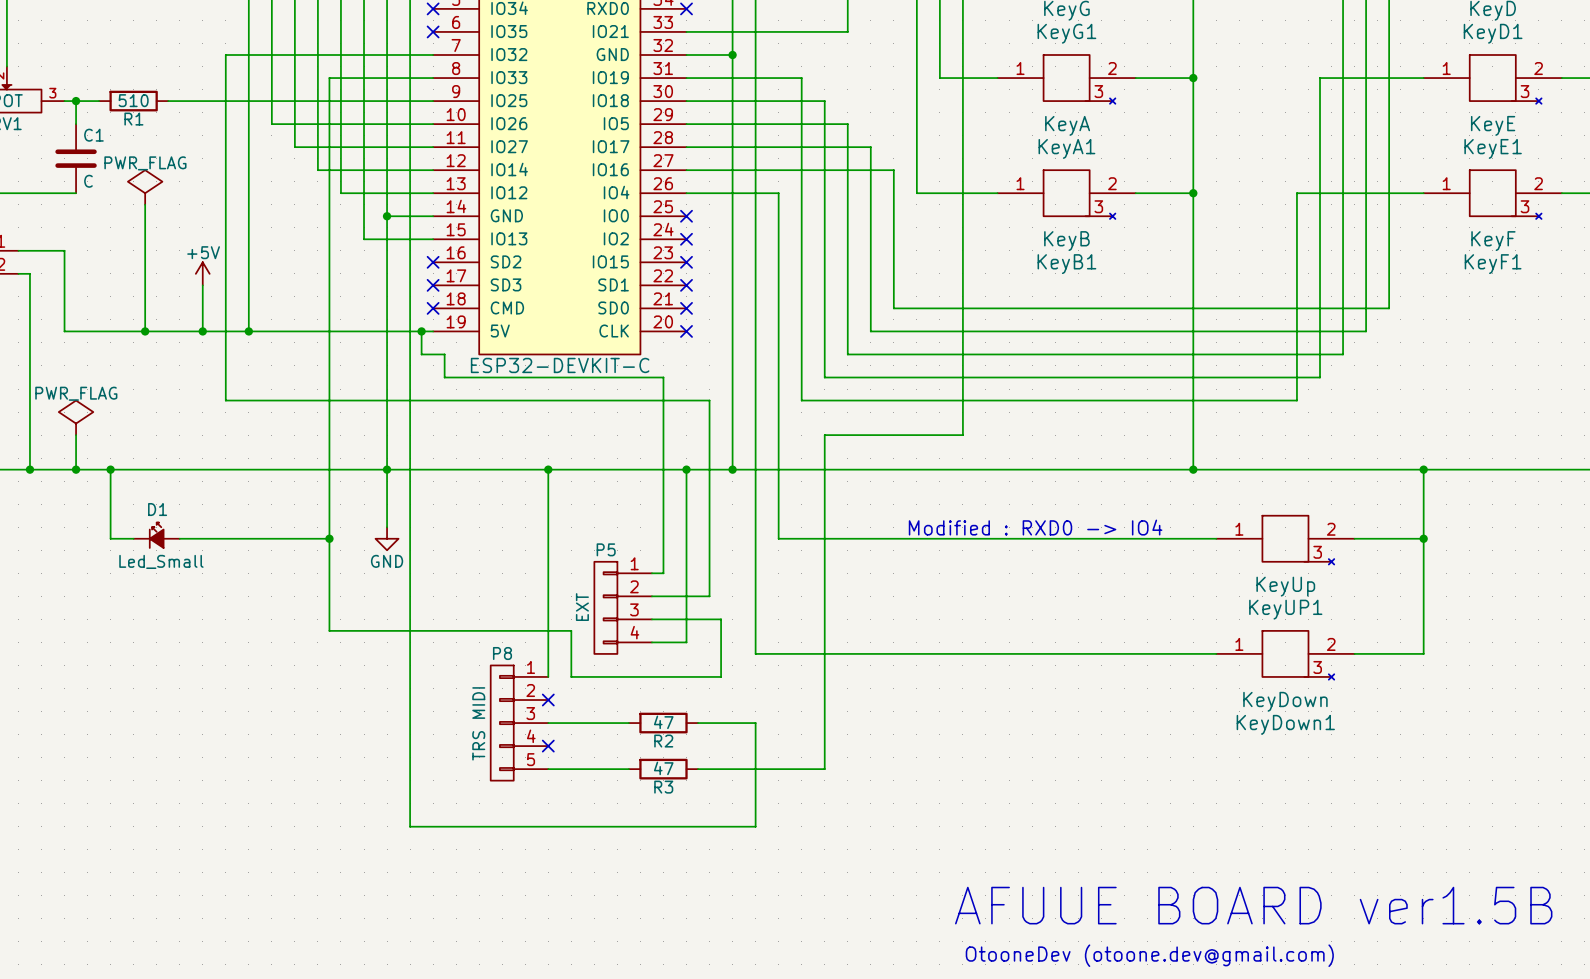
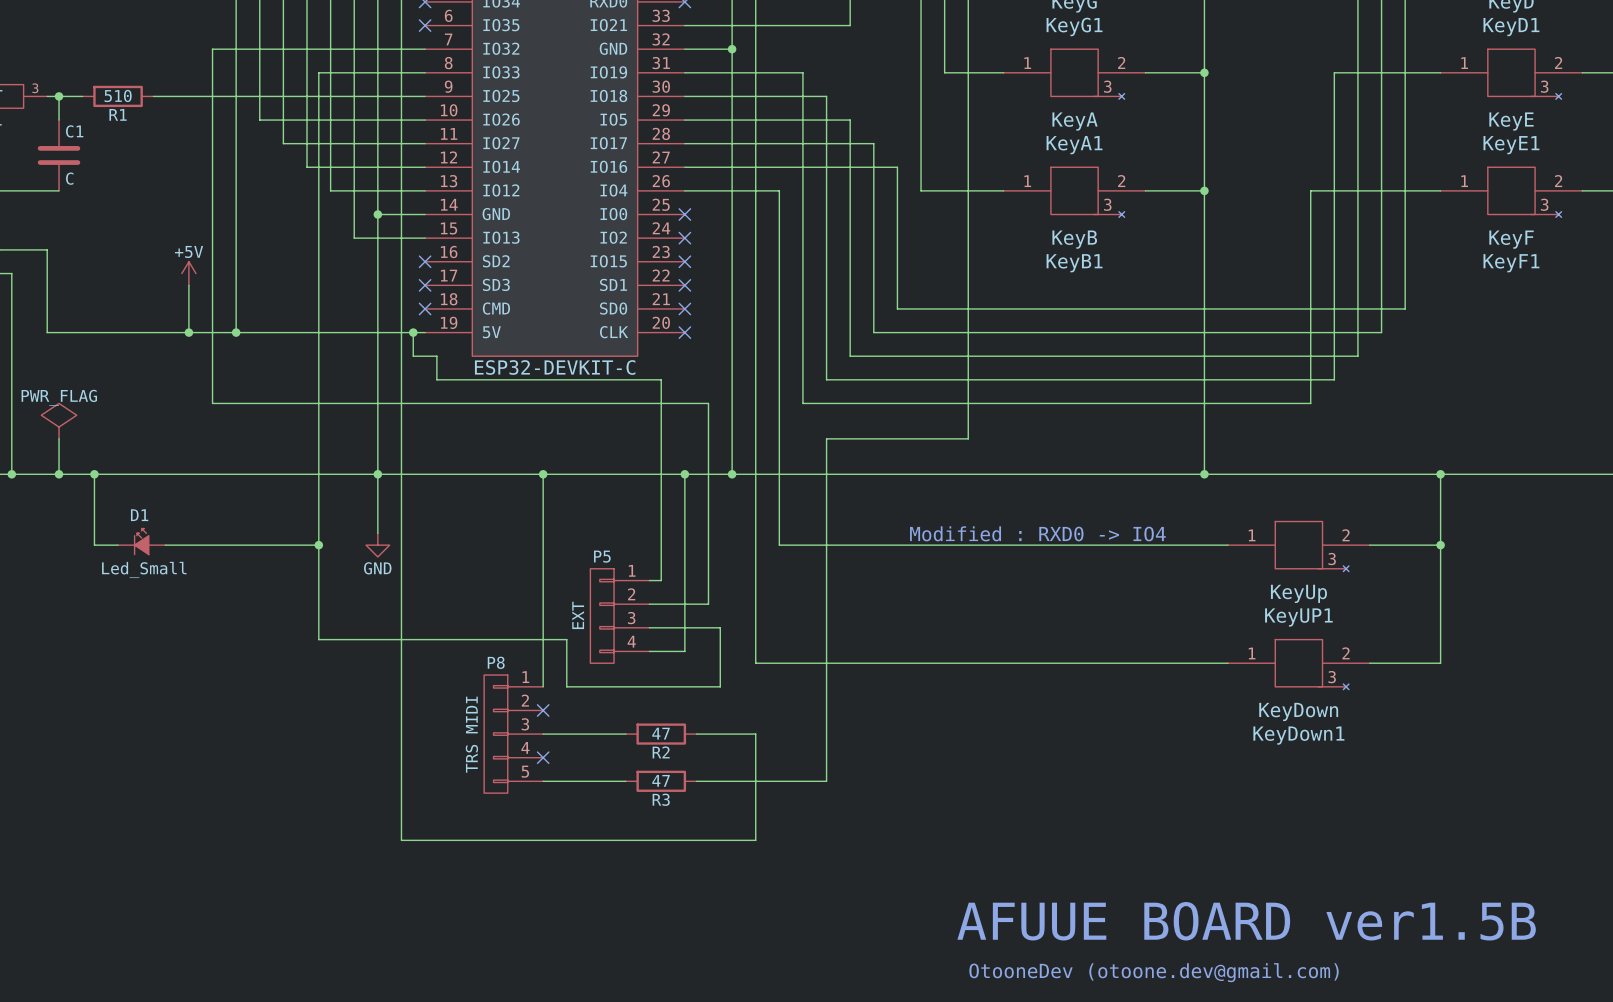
power symbol: PWR_FLAG (145, 187) -> none
wire: (145, 204) (145, 331) -> none
junction: (145, 331) -> none

